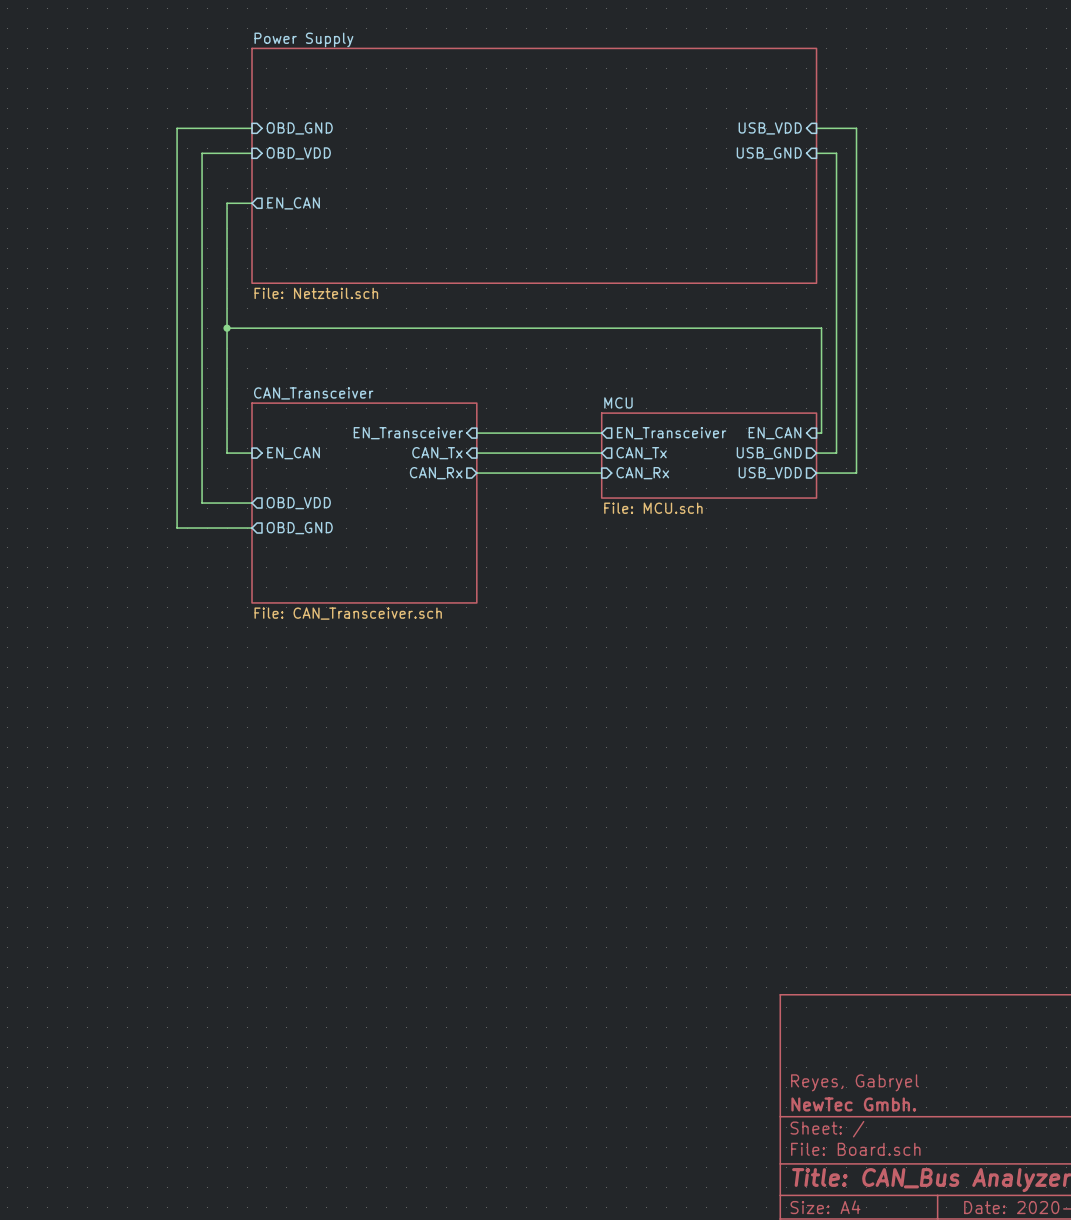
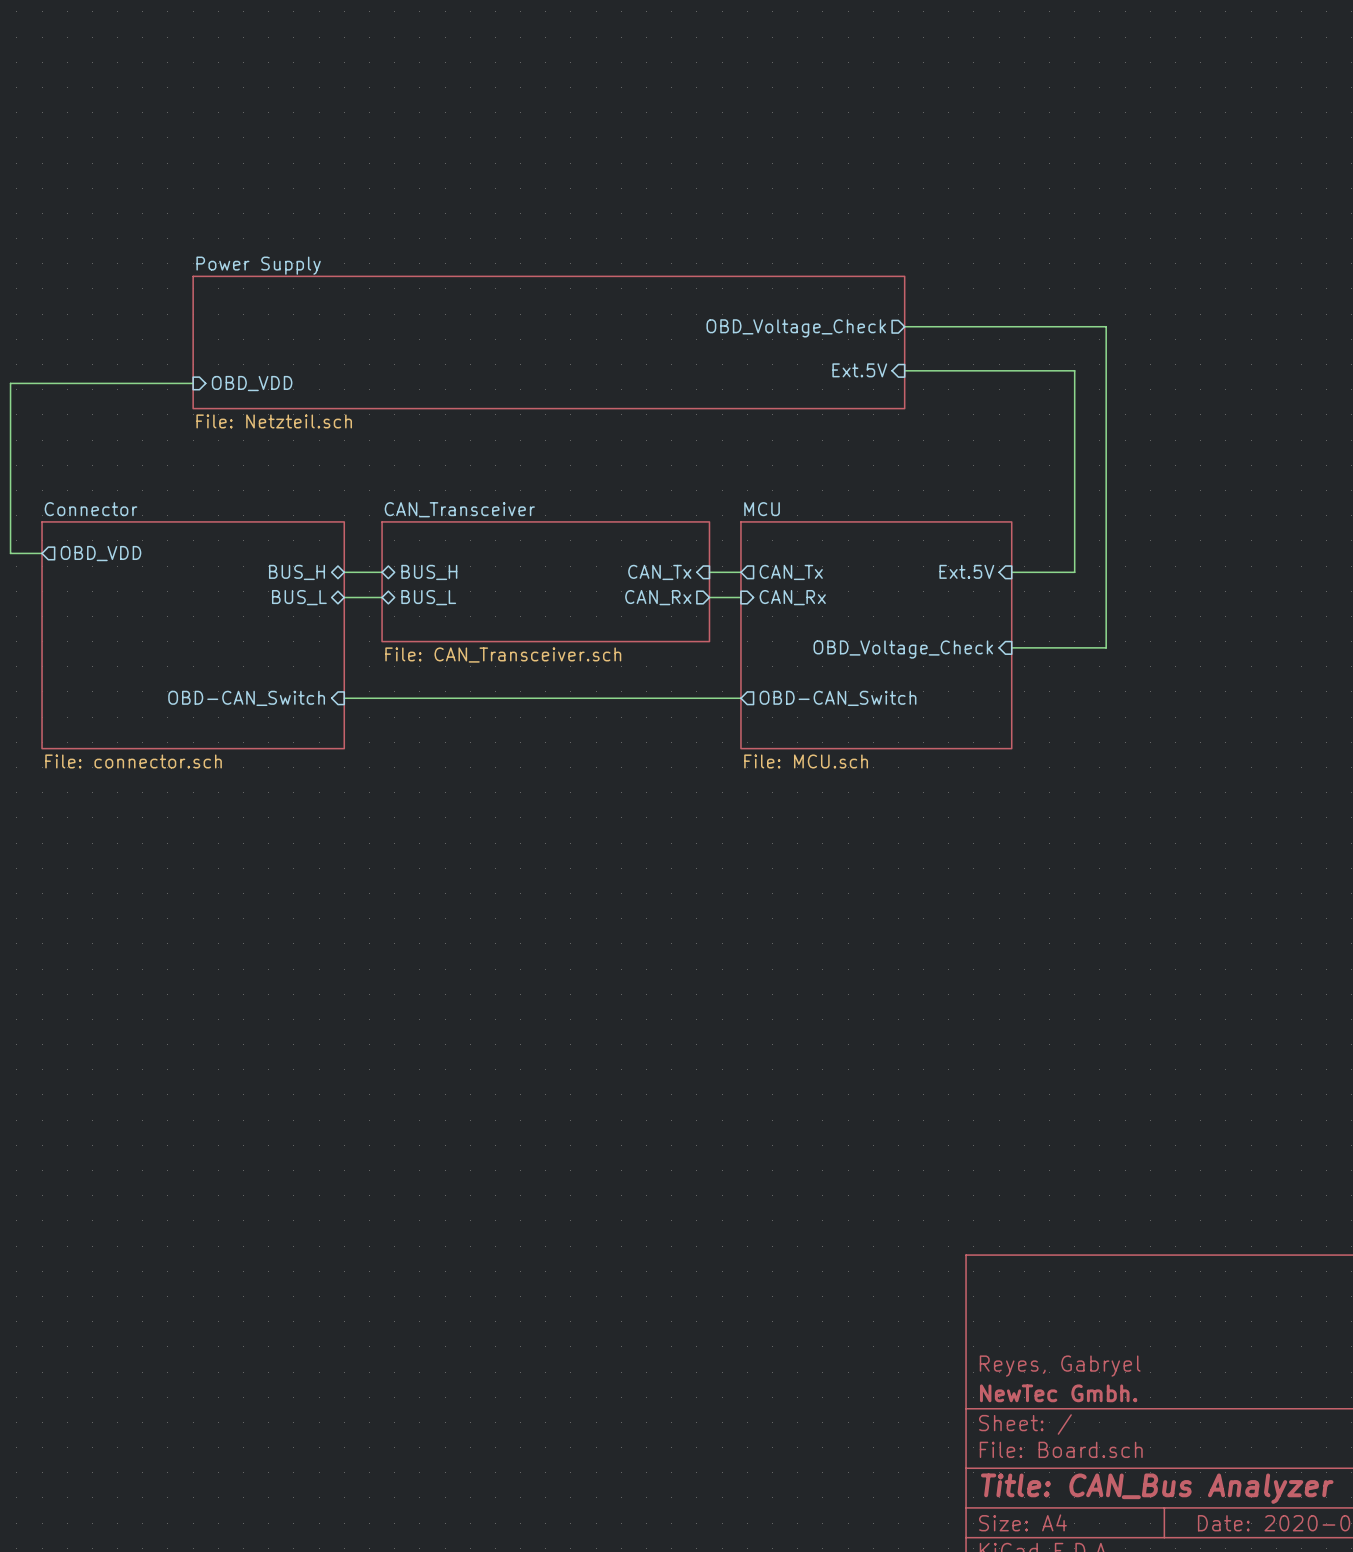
wire: (252, 128) (177, 128) (177, 528) (252, 528) -> none
sheet pin: OBD_GND (299, 128) -> none
sheet pin: USB_VDD (770, 128) -> none
wire: (816, 128) (856, 128) (856, 473) (816, 473) -> none
wire: (252, 153) (202, 153) (202, 503) (252, 503) -> none
sheet pin: OBD_VDD (298, 153) -> none
sheet pin: USB_GND (769, 153) -> none
wire: (816, 153) (836, 153) (836, 453) -> (904, 370) (1074, 370) (1074, 572) (1036, 572)
sheet Power Supply: File: Netzteil.sch (534, 165) -> none
wire: (252, 203) (227, 203) (227, 453) (252, 453) -> none
sheet pin: EN_CAN (293, 203) -> none
wire: none -> (904, 326) (1106, 326) (1106, 647) (1011, 647)
sheet pin: none -> OBD_Voltage_Check (796, 328)
sheet Power Supply: none -> File: Netzteil.sch (548, 342)
sheet pin: none -> Ext.5V (859, 370)
wire: none -> (193, 383) (10, 383) (10, 553) (42, 553)
sheet pin: none -> OBD_VDD (252, 383)
wire: (227, 328) (821, 328) (821, 433) (816, 433) -> none
junction: (227, 328) -> none
sheet pin: EN_Transceiver (408, 433) -> none
wire: (476, 433) (601, 433) -> none
sheet pin: EN_Transceiver (671, 433) -> none
sheet pin: EN_CAN (774, 433) -> none
sheet pin: none -> OBD_VDD (100, 553)
sheet pin: none -> BUS_H (296, 572)
wire: none -> (344, 572) (382, 572)
sheet pin: EN_CAN (293, 453) -> none
sheet pin: none -> BUS_H (429, 572)
sheet pin position: CAN_Tx (437, 453) -> CAN_Tx (659, 572)
wire: (476, 453) (576, 453) -> none
sheet pin shape: output (769, 453) -> input (966, 571)
sheet pin: USB_GND (769, 453) -> Ext.5V (966, 571)
sheet MCU: File: MCU.sch (709, 455) -> none
sheet CAN_Transceiver: none -> File: CAN_Transceiver.sch (545, 581)
sheet pin: none -> BUS_L (299, 597)
wire: none -> (344, 597) (382, 597)
sheet pin: none -> BUS_L (428, 597)
sheet pin position: CAN_Rx (436, 473) -> CAN_Rx (658, 597)
wire: (476, 473) (576, 473) -> none
sheet pin: USB_VDD (770, 473) -> none
sheet Connector: none -> File: connector.sch (193, 635)
sheet pin: OBD_VDD (298, 503) -> none
sheet CAN_Transceiver: File: CAN_Transceiver.sch (364, 503) -> none
sheet MCU: none -> File: MCU.sch (876, 635)
sheet pin: none -> OBD_Voltage_Check (903, 649)
sheet pin: OBD_GND (299, 528) -> none
wire: none -> (344, 698) (740, 698)
sheet pin: none -> OBD-CAN_Switch (246, 698)
sheet pin: none -> OBD-CAN_Switch (838, 698)

